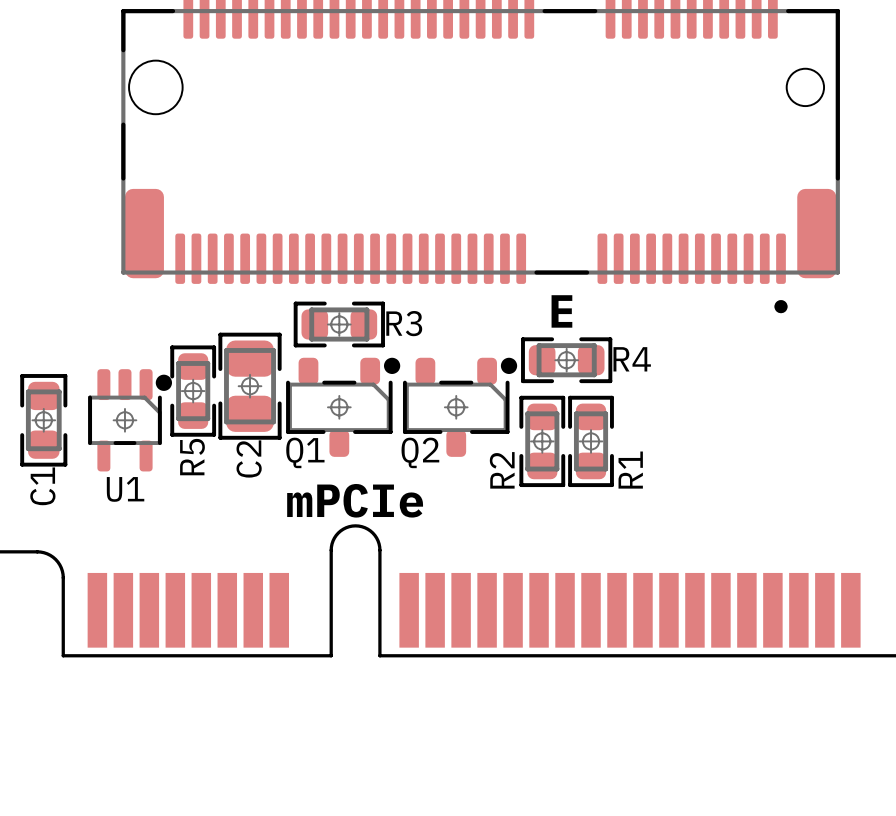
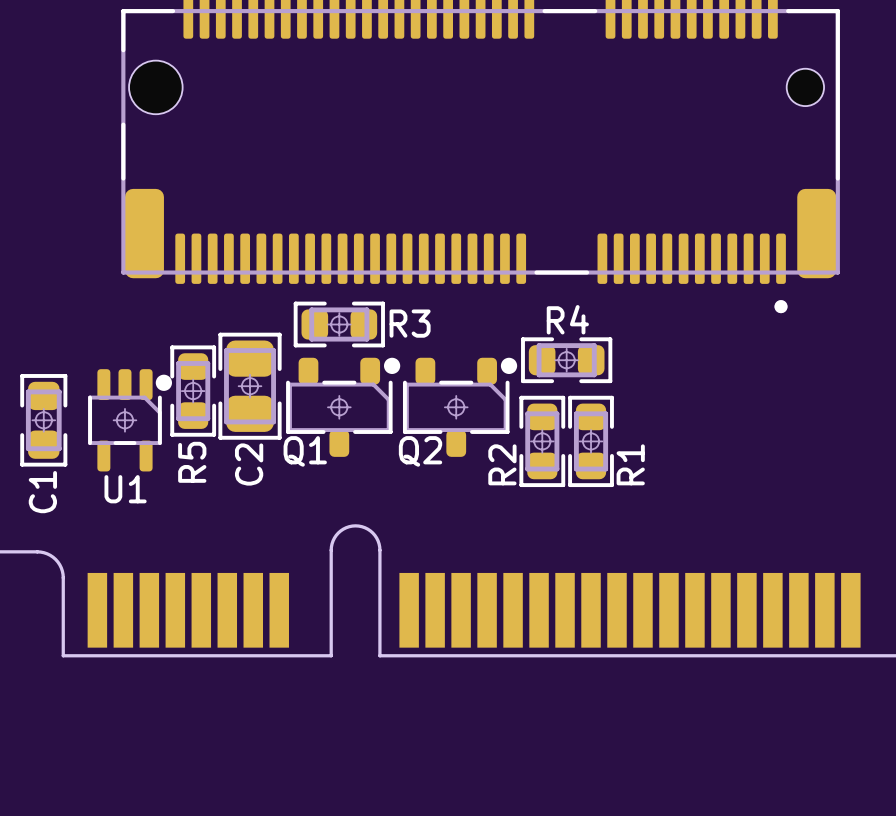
text: E (561, 311) -> none
R4 name position: R4 (632, 359) -> R4 (567, 319)
text: mPCIe (355, 500) -> none

